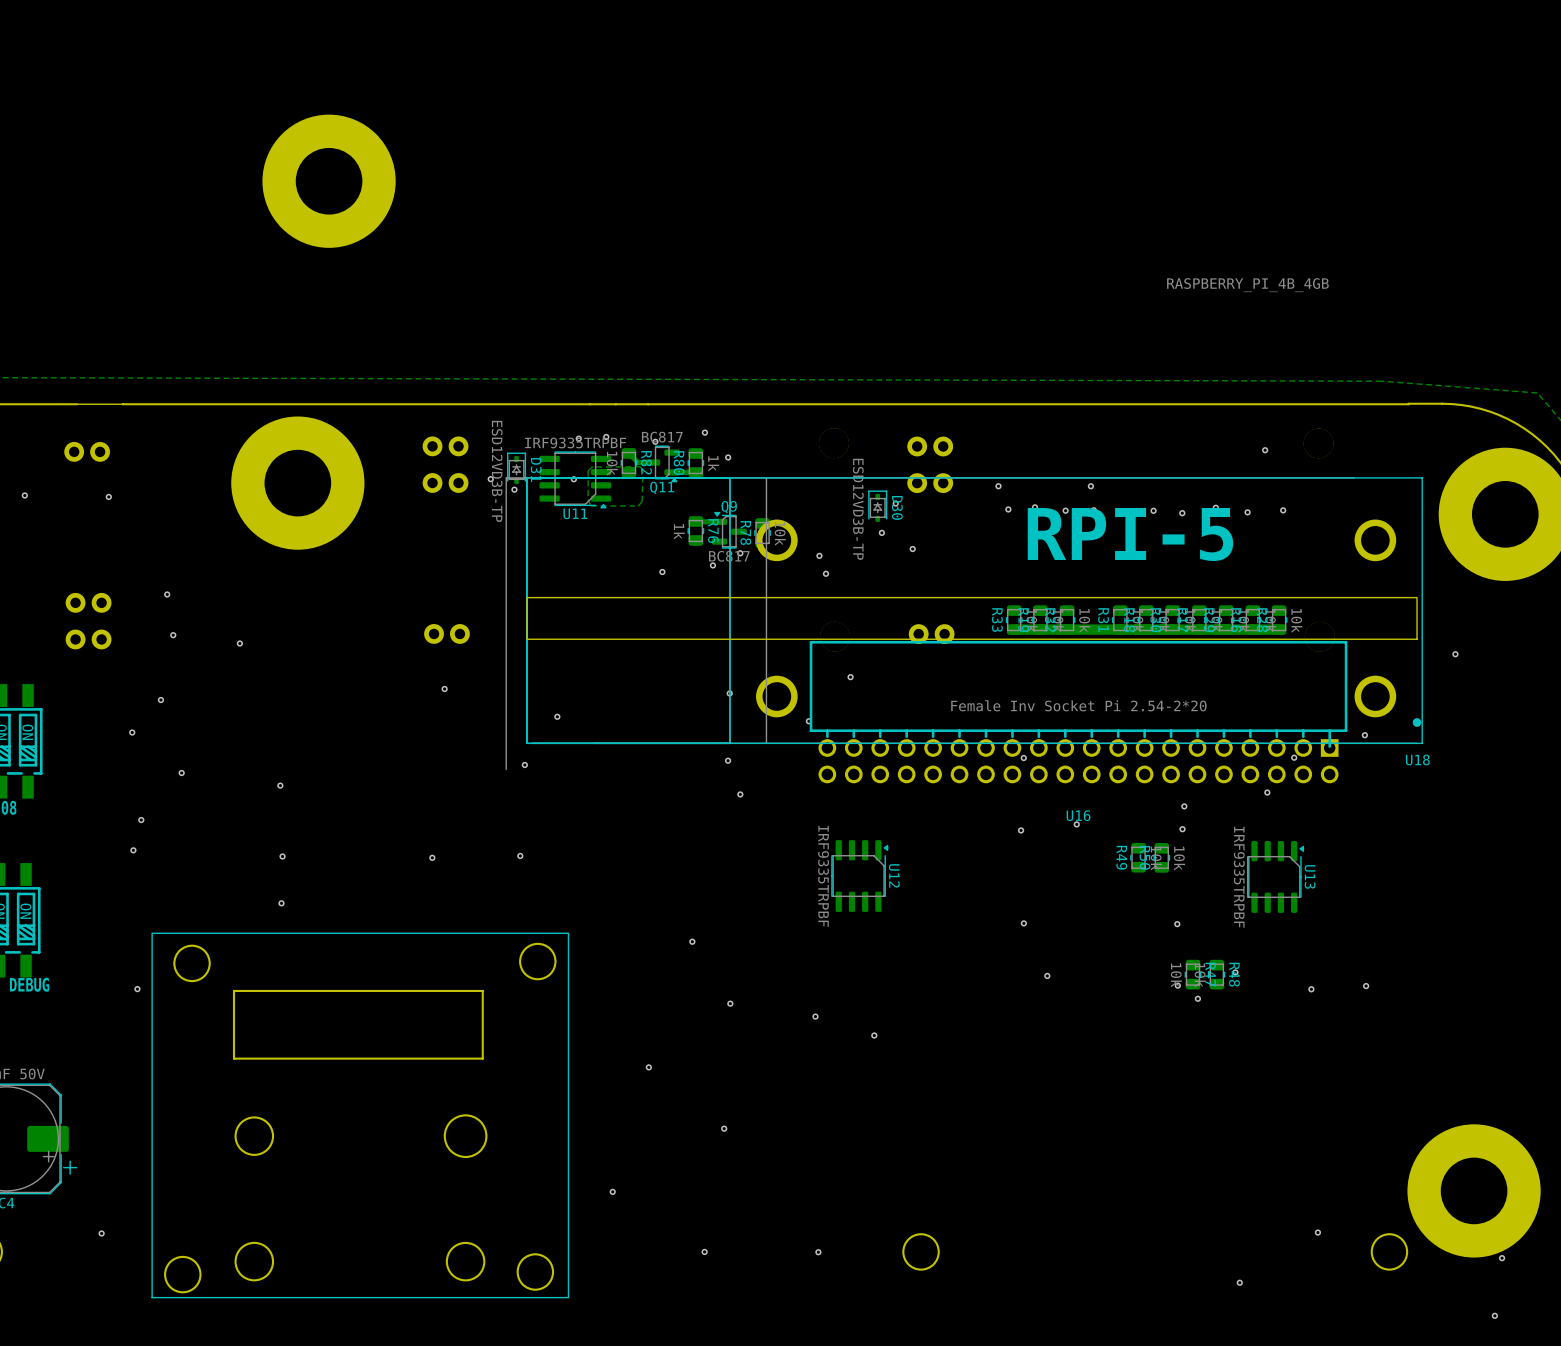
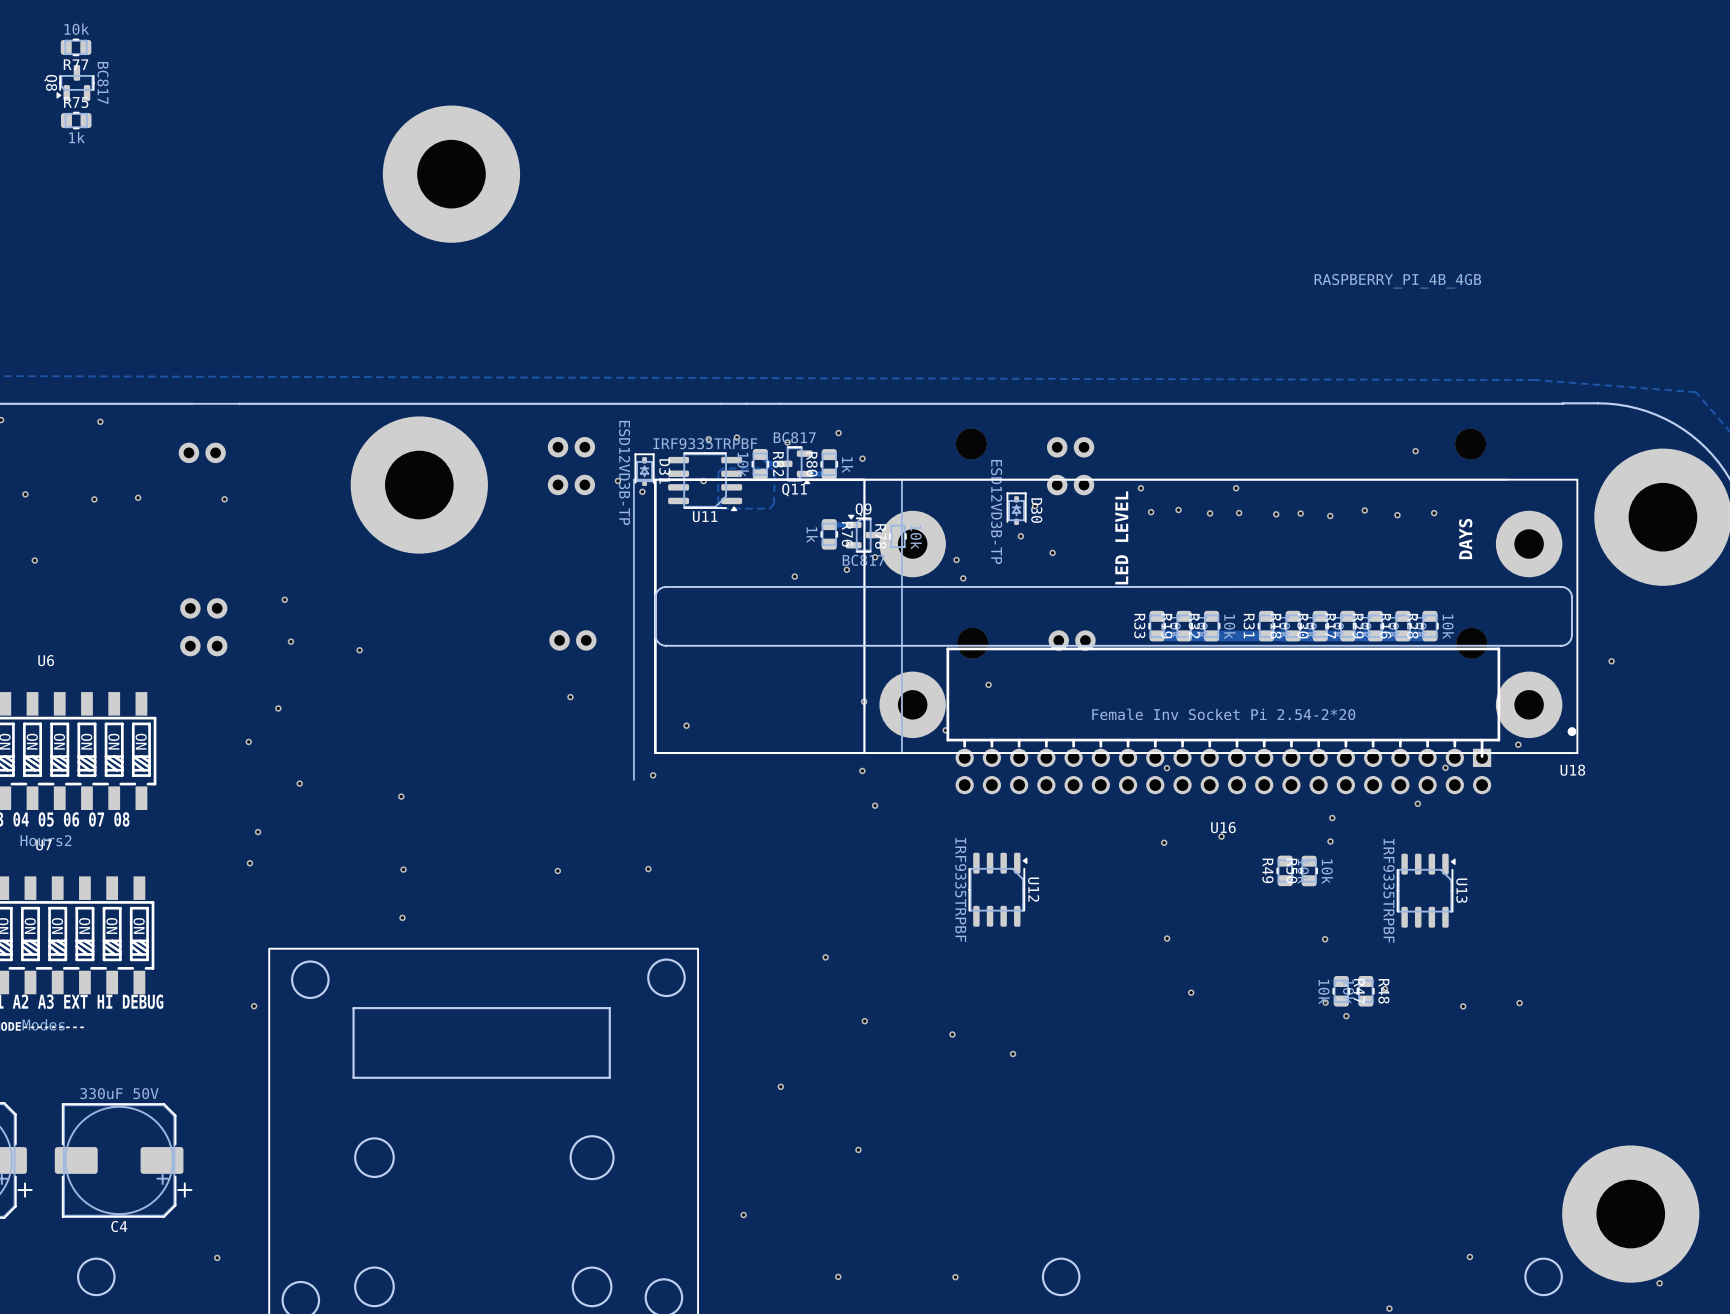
U18 footprint: [505, 477, 1423, 771] -> [633, 479, 1579, 781]
text: none -> LED LEVEL (1121, 537)
text: RPI-5 (1130, 534) -> none
text: none -> DAYS (1465, 539)

